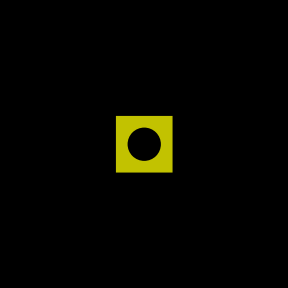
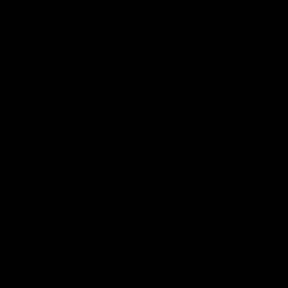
part: (144, 144) -> none

